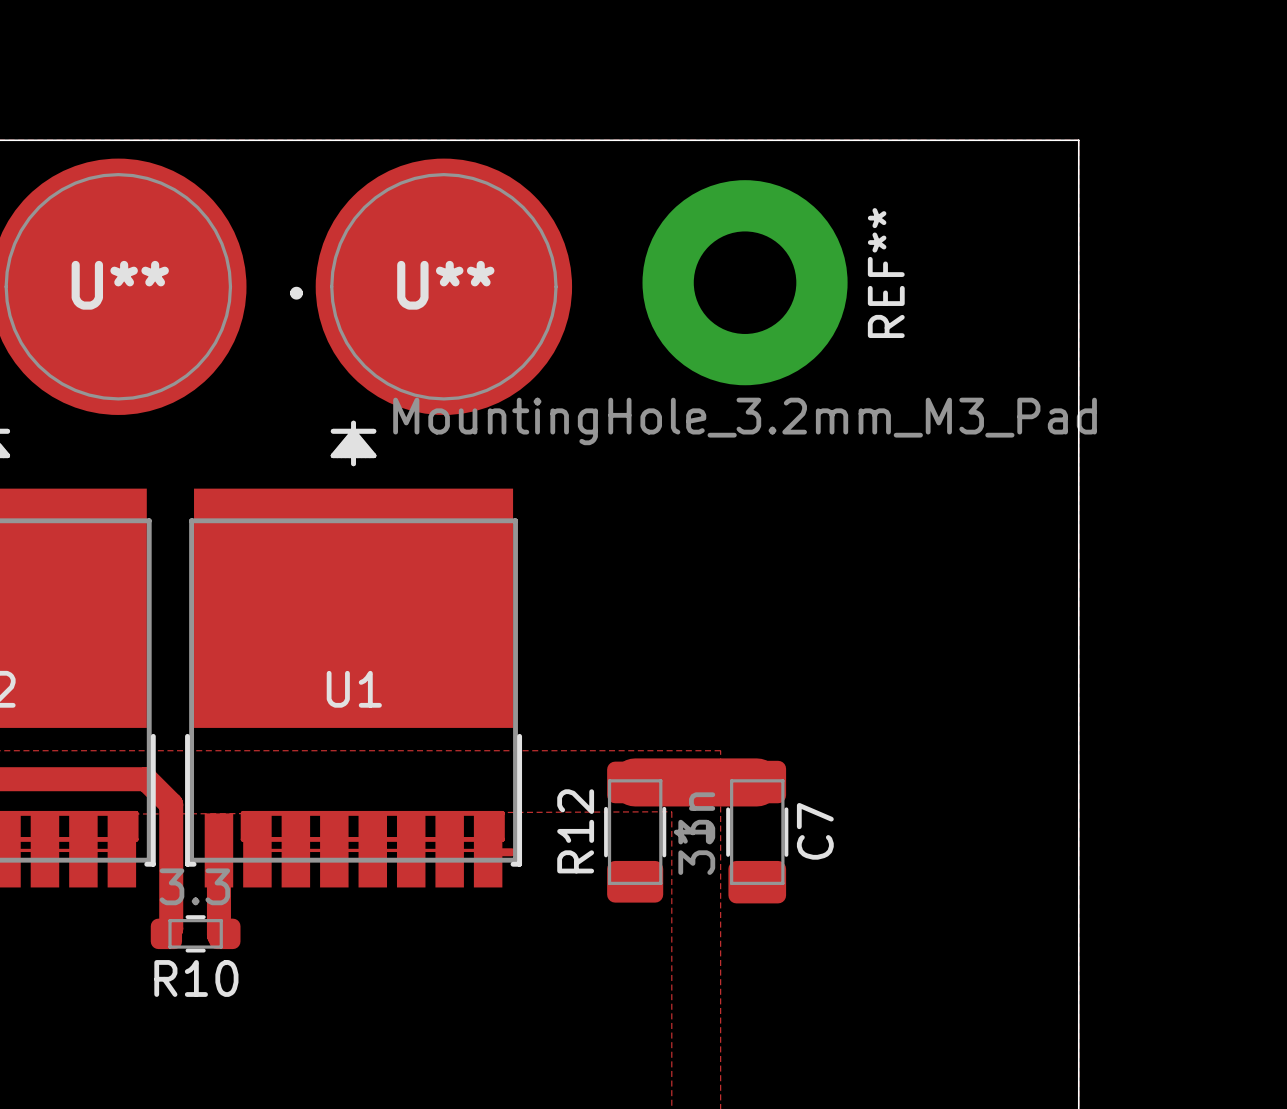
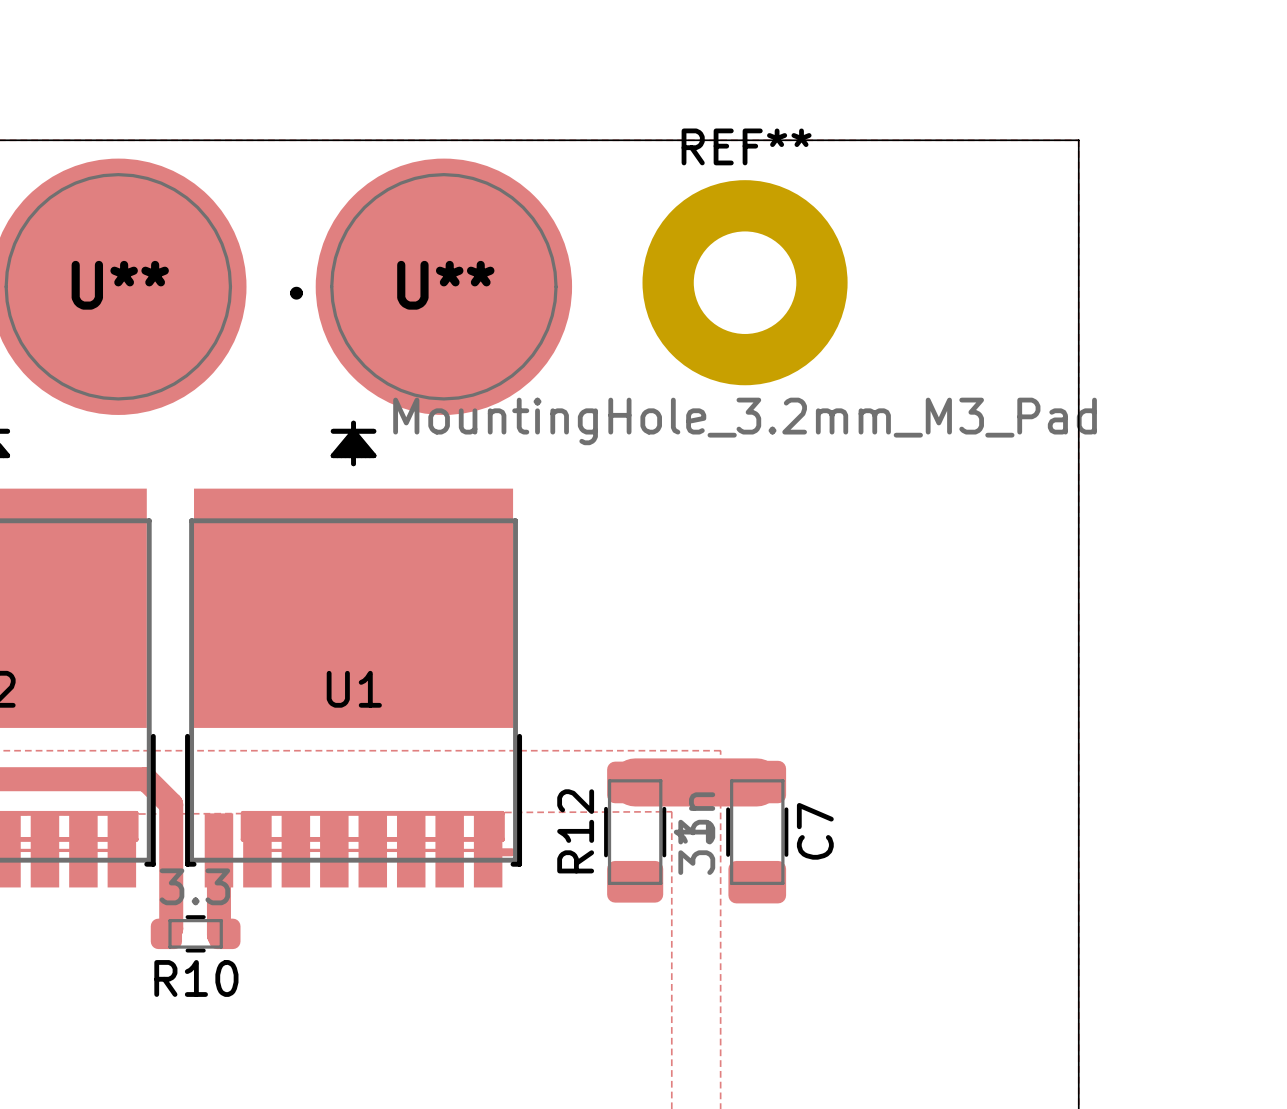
REF** name rotation: 0° (886, 273) -> 90° clockwise (746, 146)
REF** name position: REF** (886, 273) -> REF** (746, 146)

